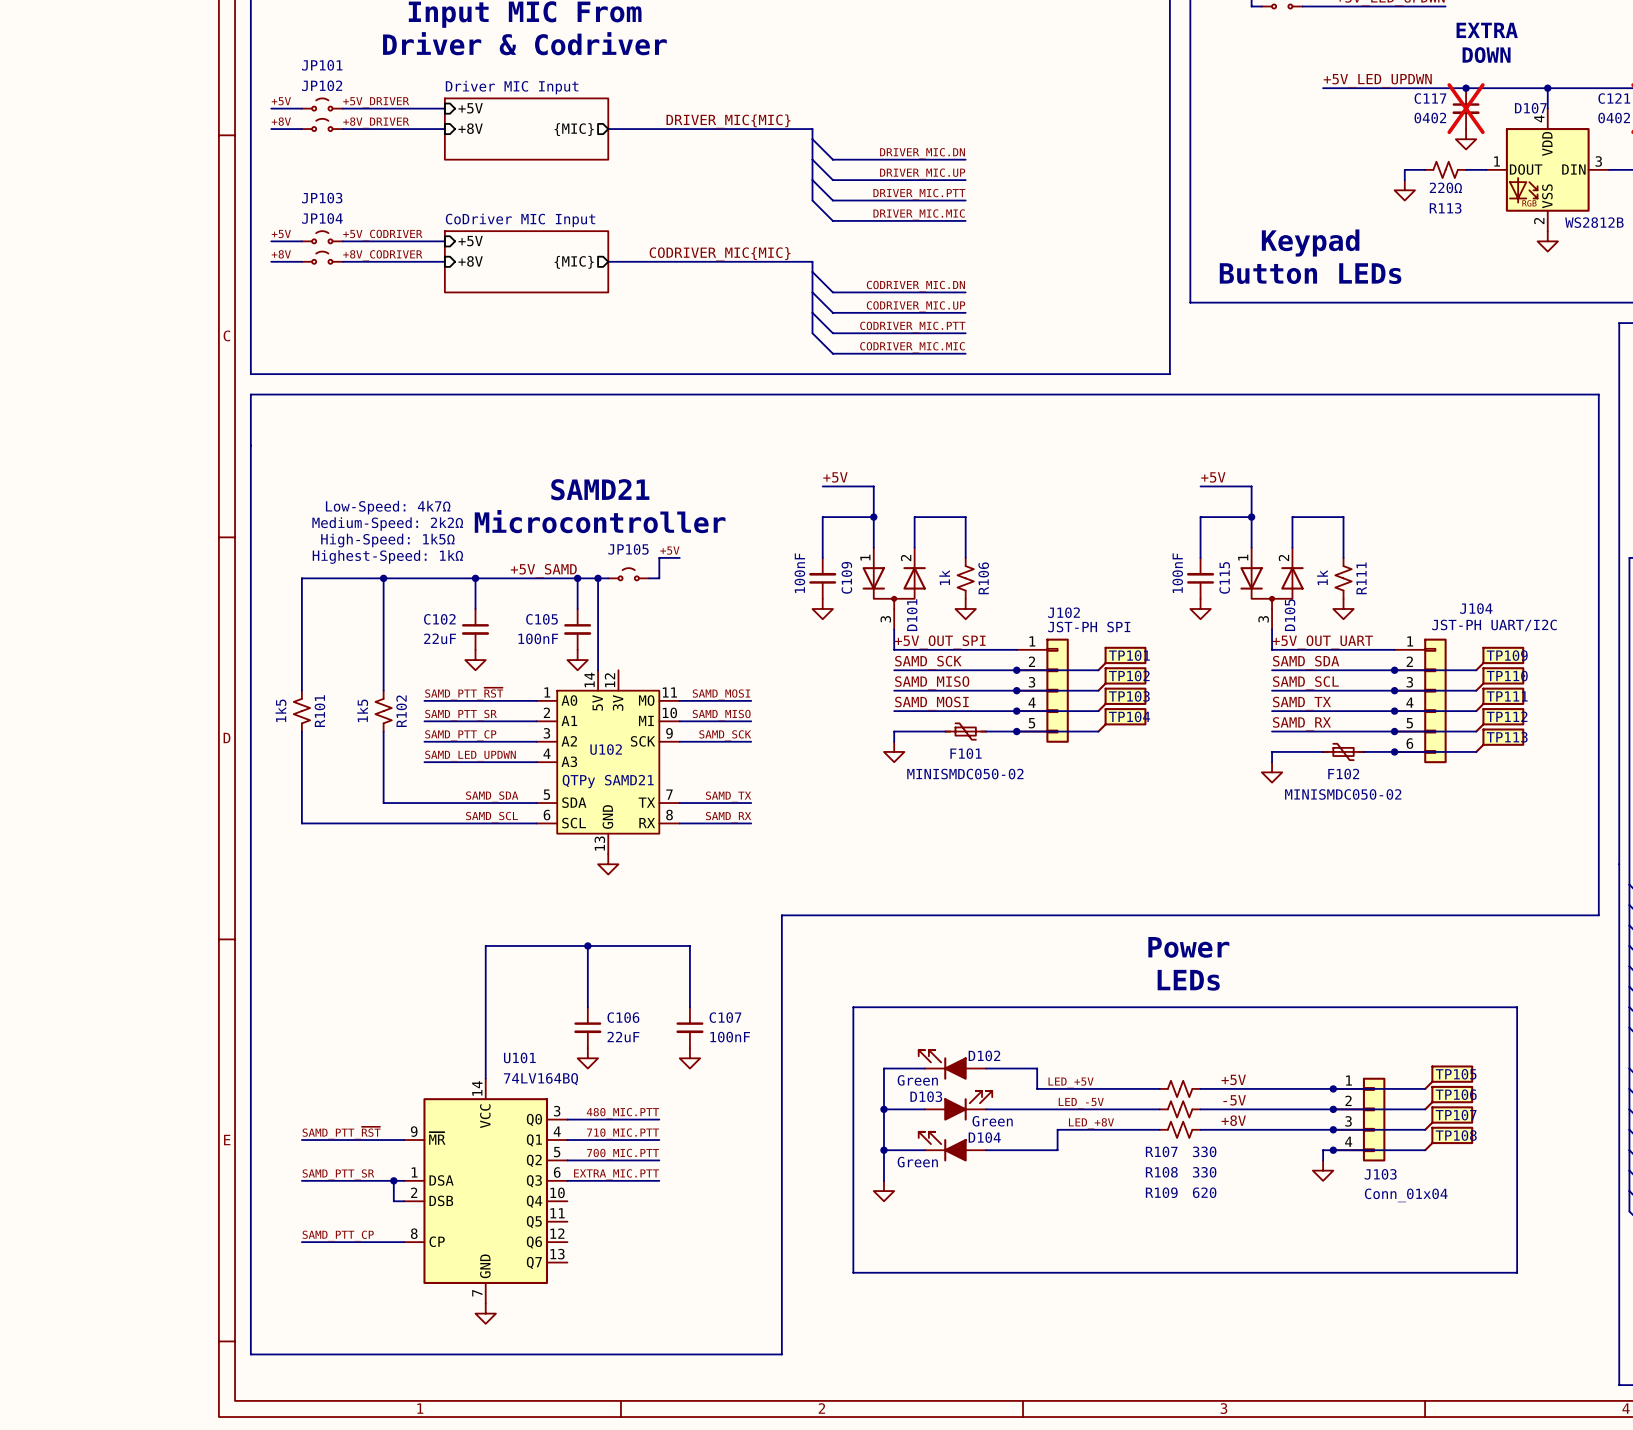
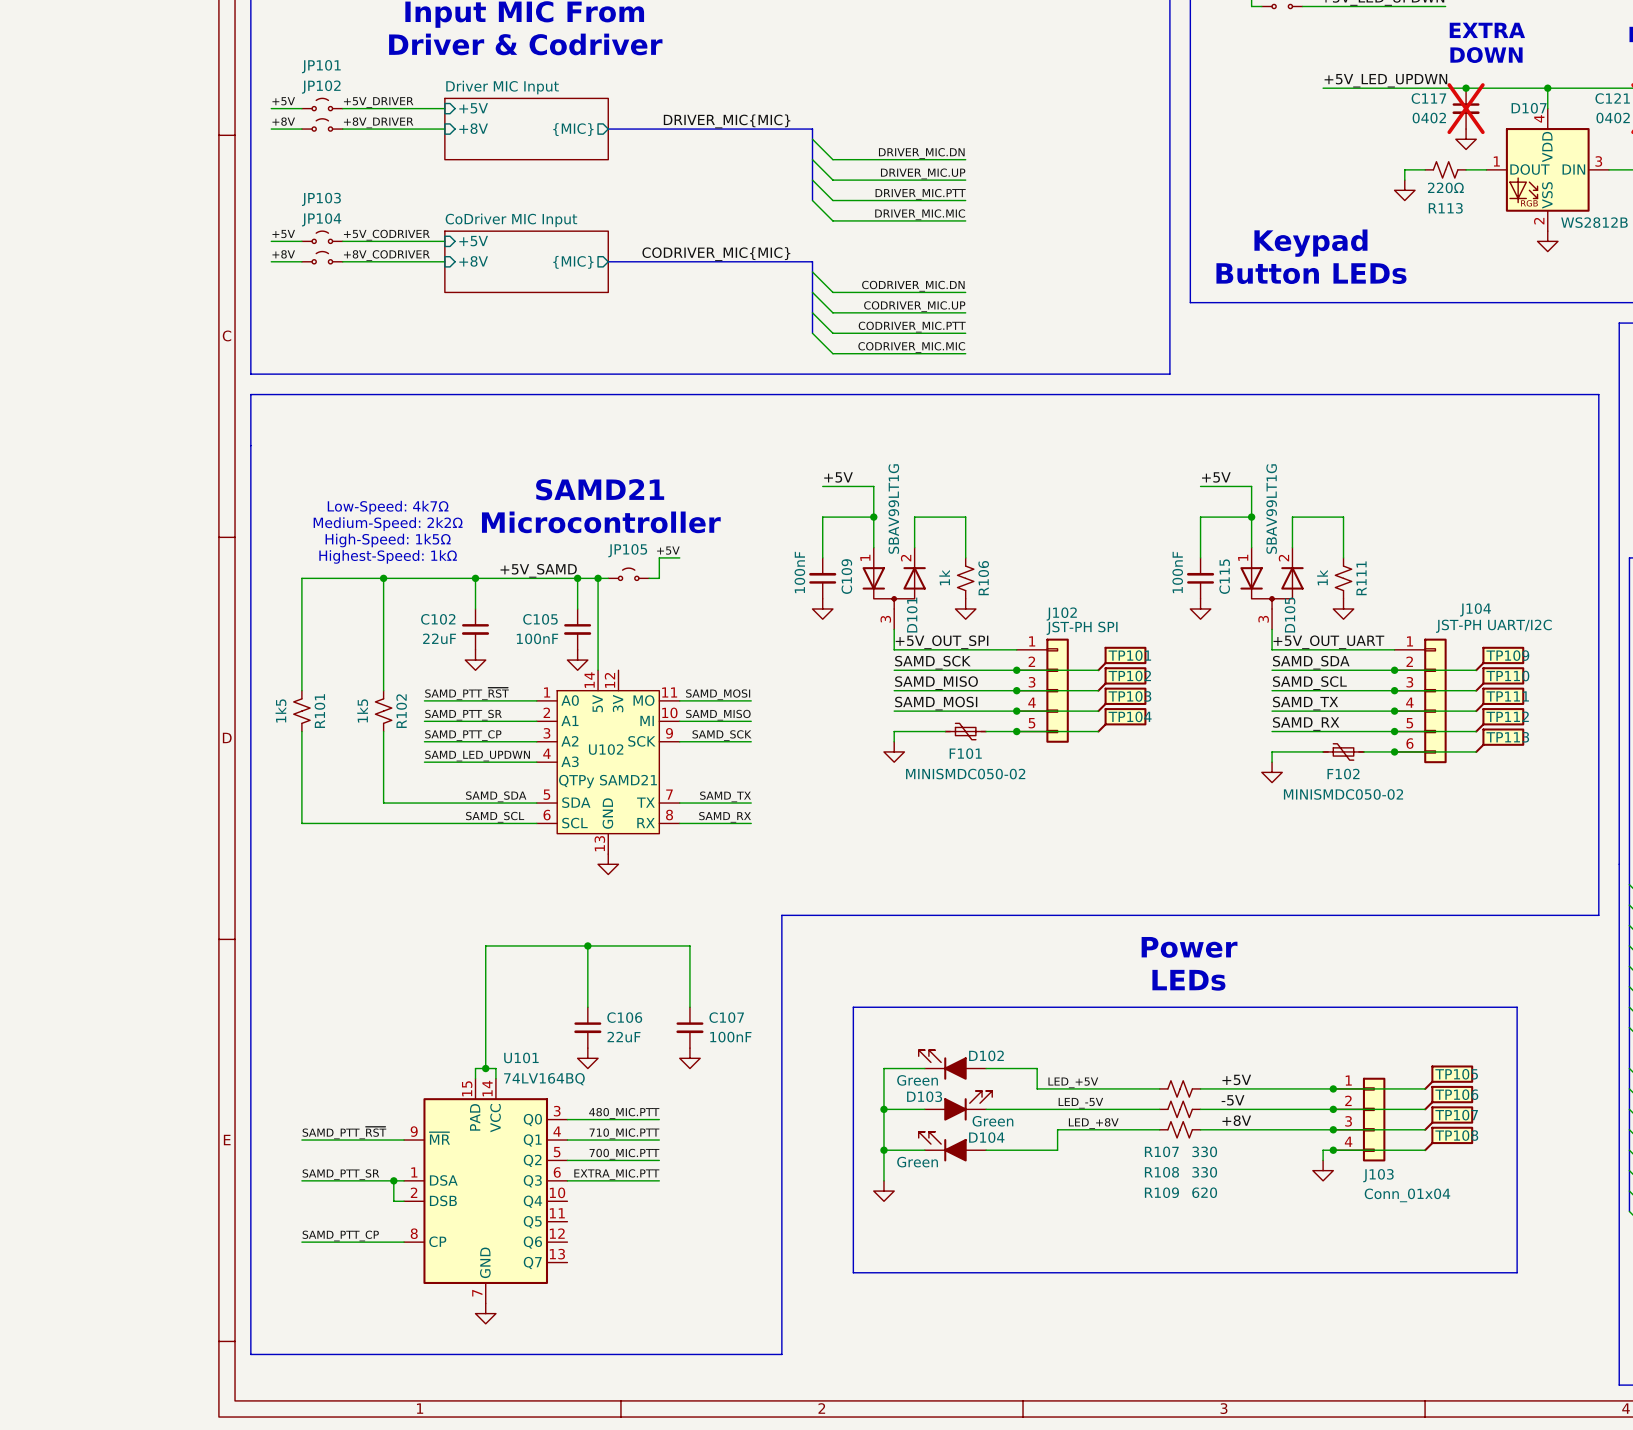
D101 value: none -> SBAV99LT1G (893, 509)
D105 value: none -> SBAV99LT1G (1271, 509)
wire: (485, 1068) (485, 1078) -> none
junction: none -> (485, 1068)
U101 symbol: [404, 1078, 568, 1304] -> [404, 1078, 568, 1304]
wire: none -> (475, 1078) (475, 1068) (495, 1068) (495, 1078)

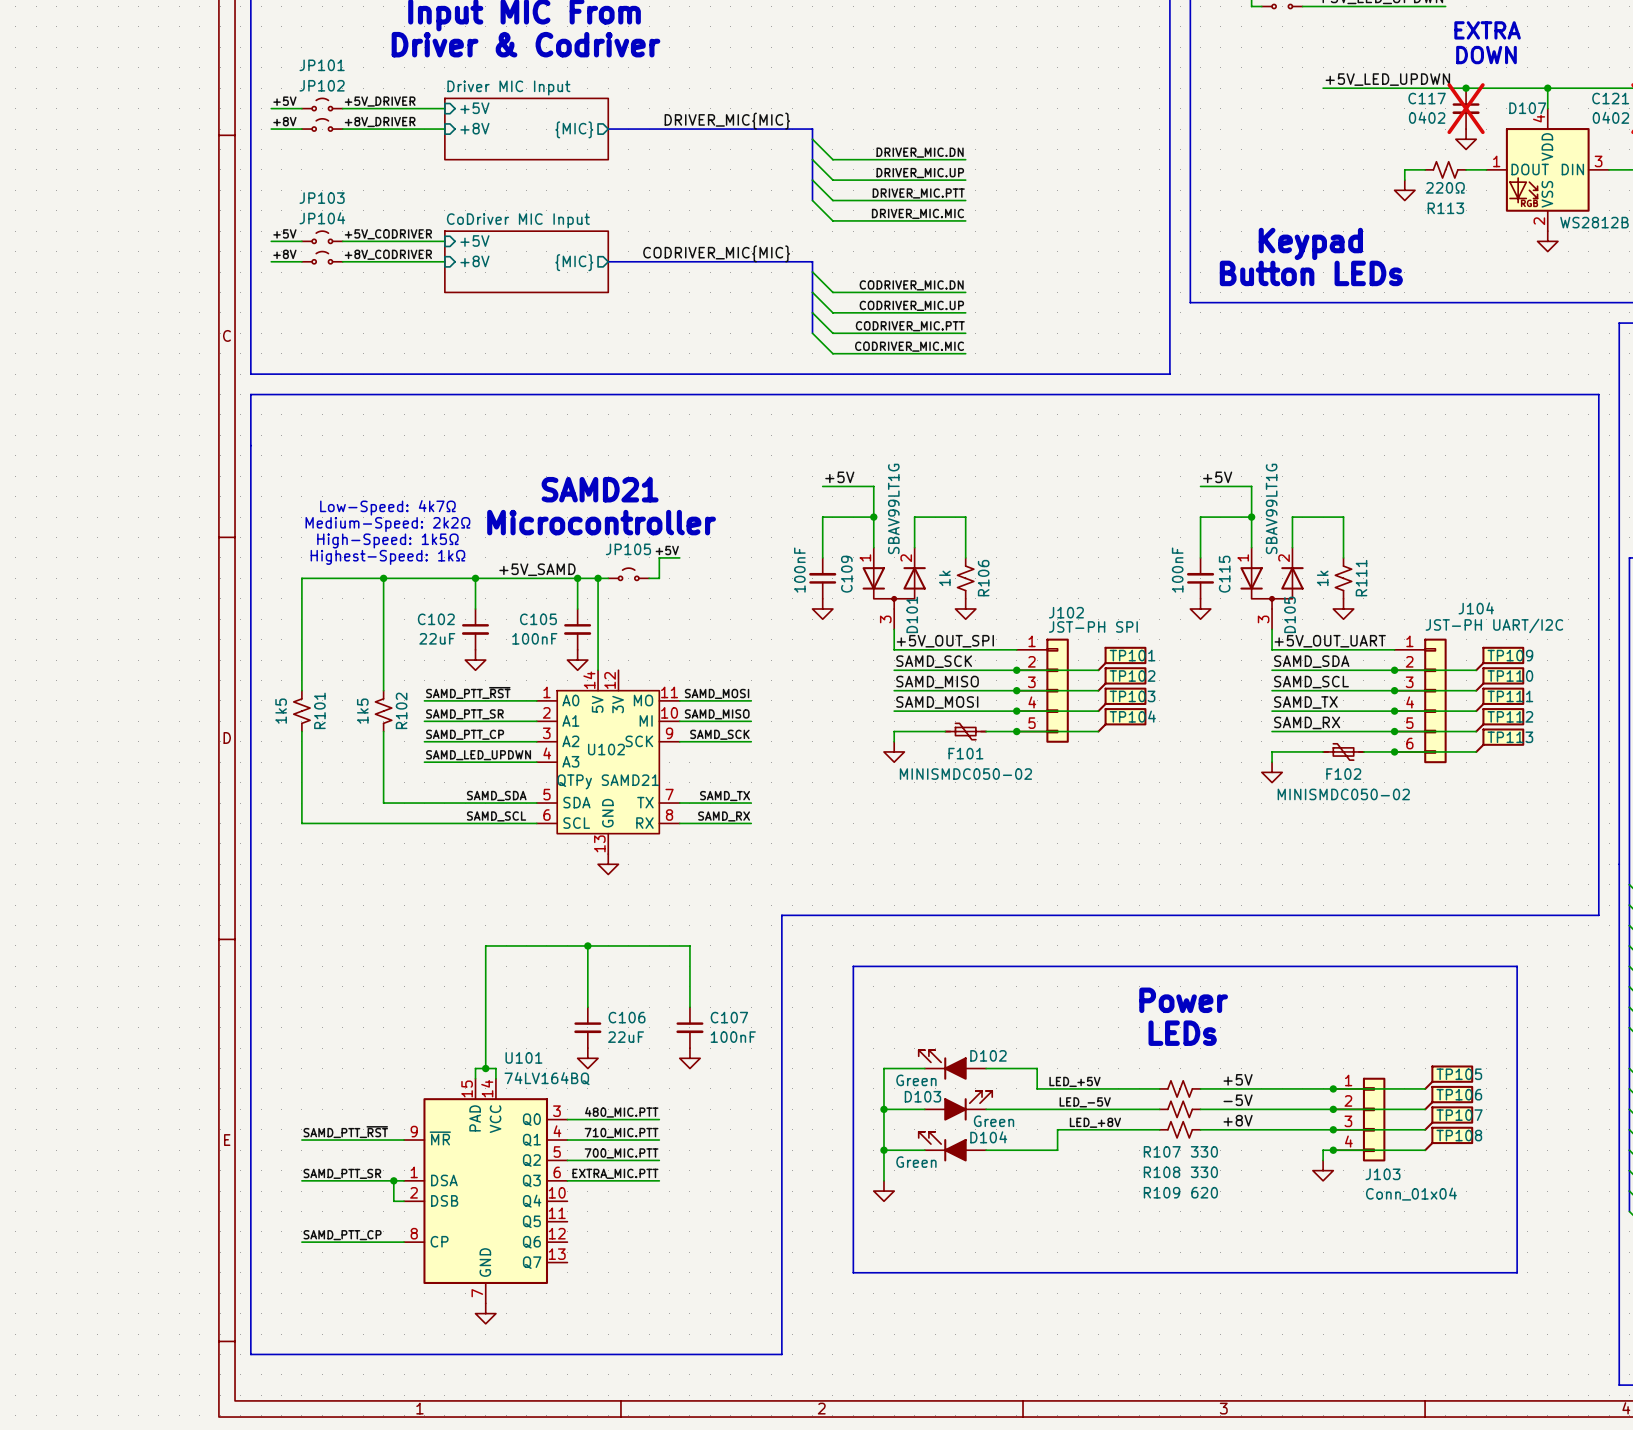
text position: Power (1189, 947) -> Power (1183, 1000)
text position: LEDs (1188, 980) -> LEDs (1182, 1033)
line: (853, 1007) (1517, 1007) -> (853, 1007) (853, 966) (1517, 966) (1517, 1007)

